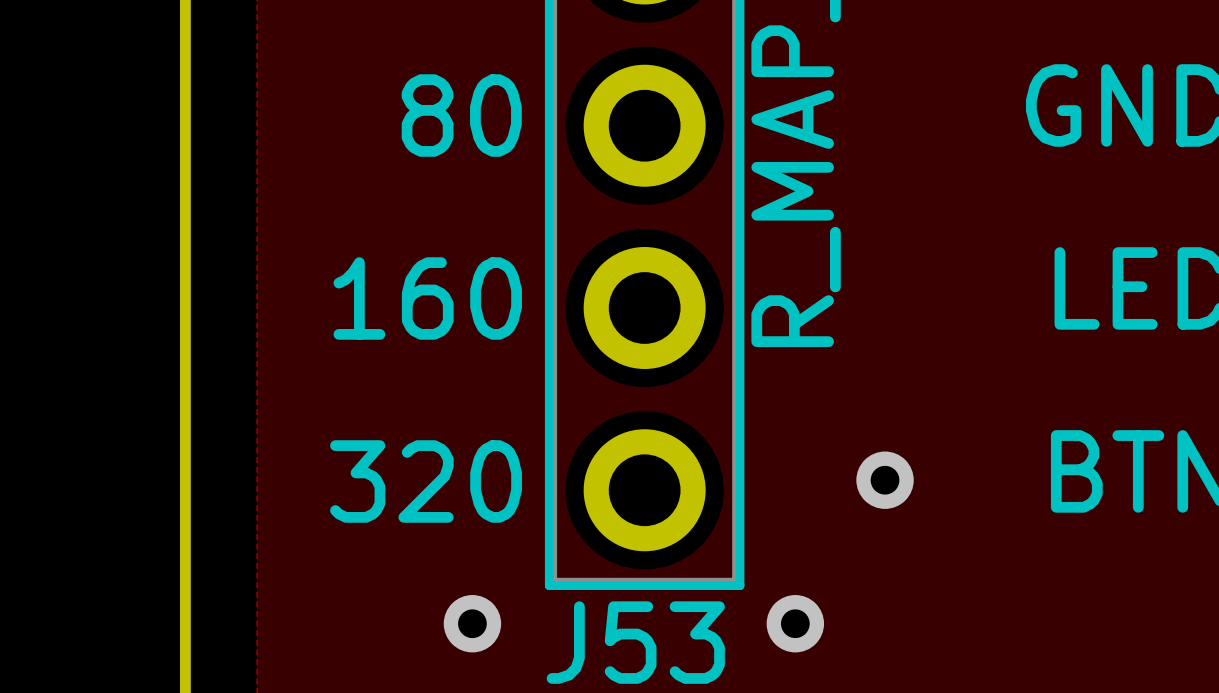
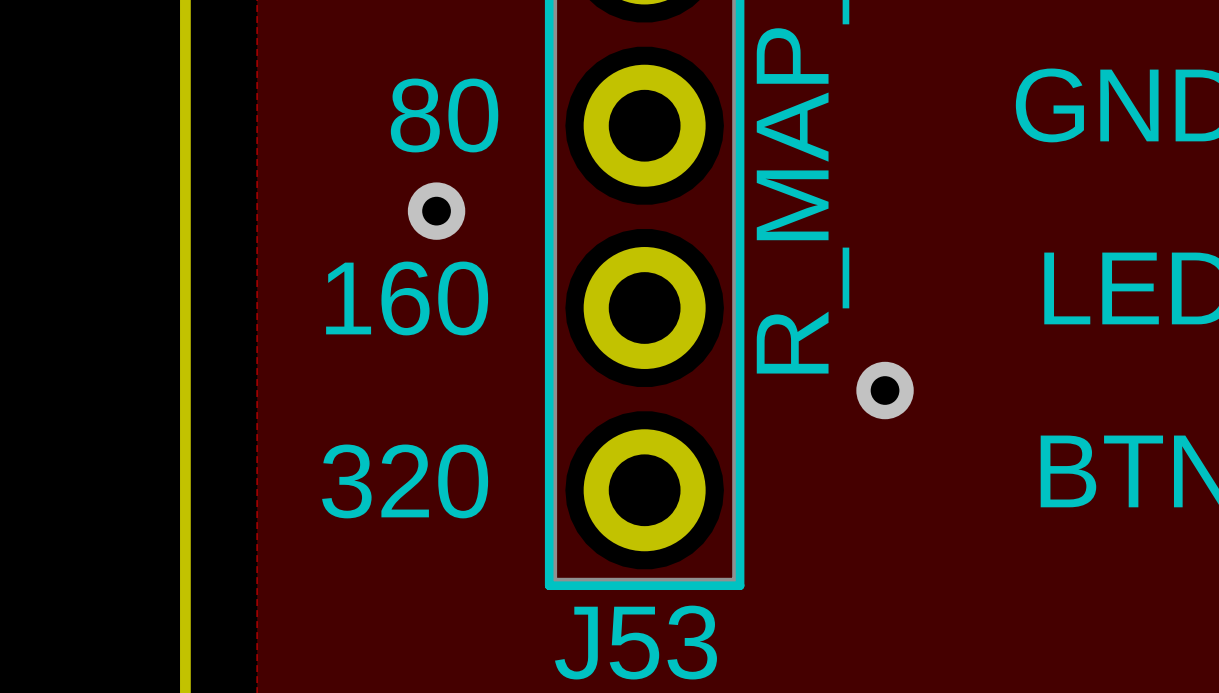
via: none -> (436, 211)
via position: (885, 480) -> (885, 390)
via: (472, 623) -> none
via: (795, 623) -> none

